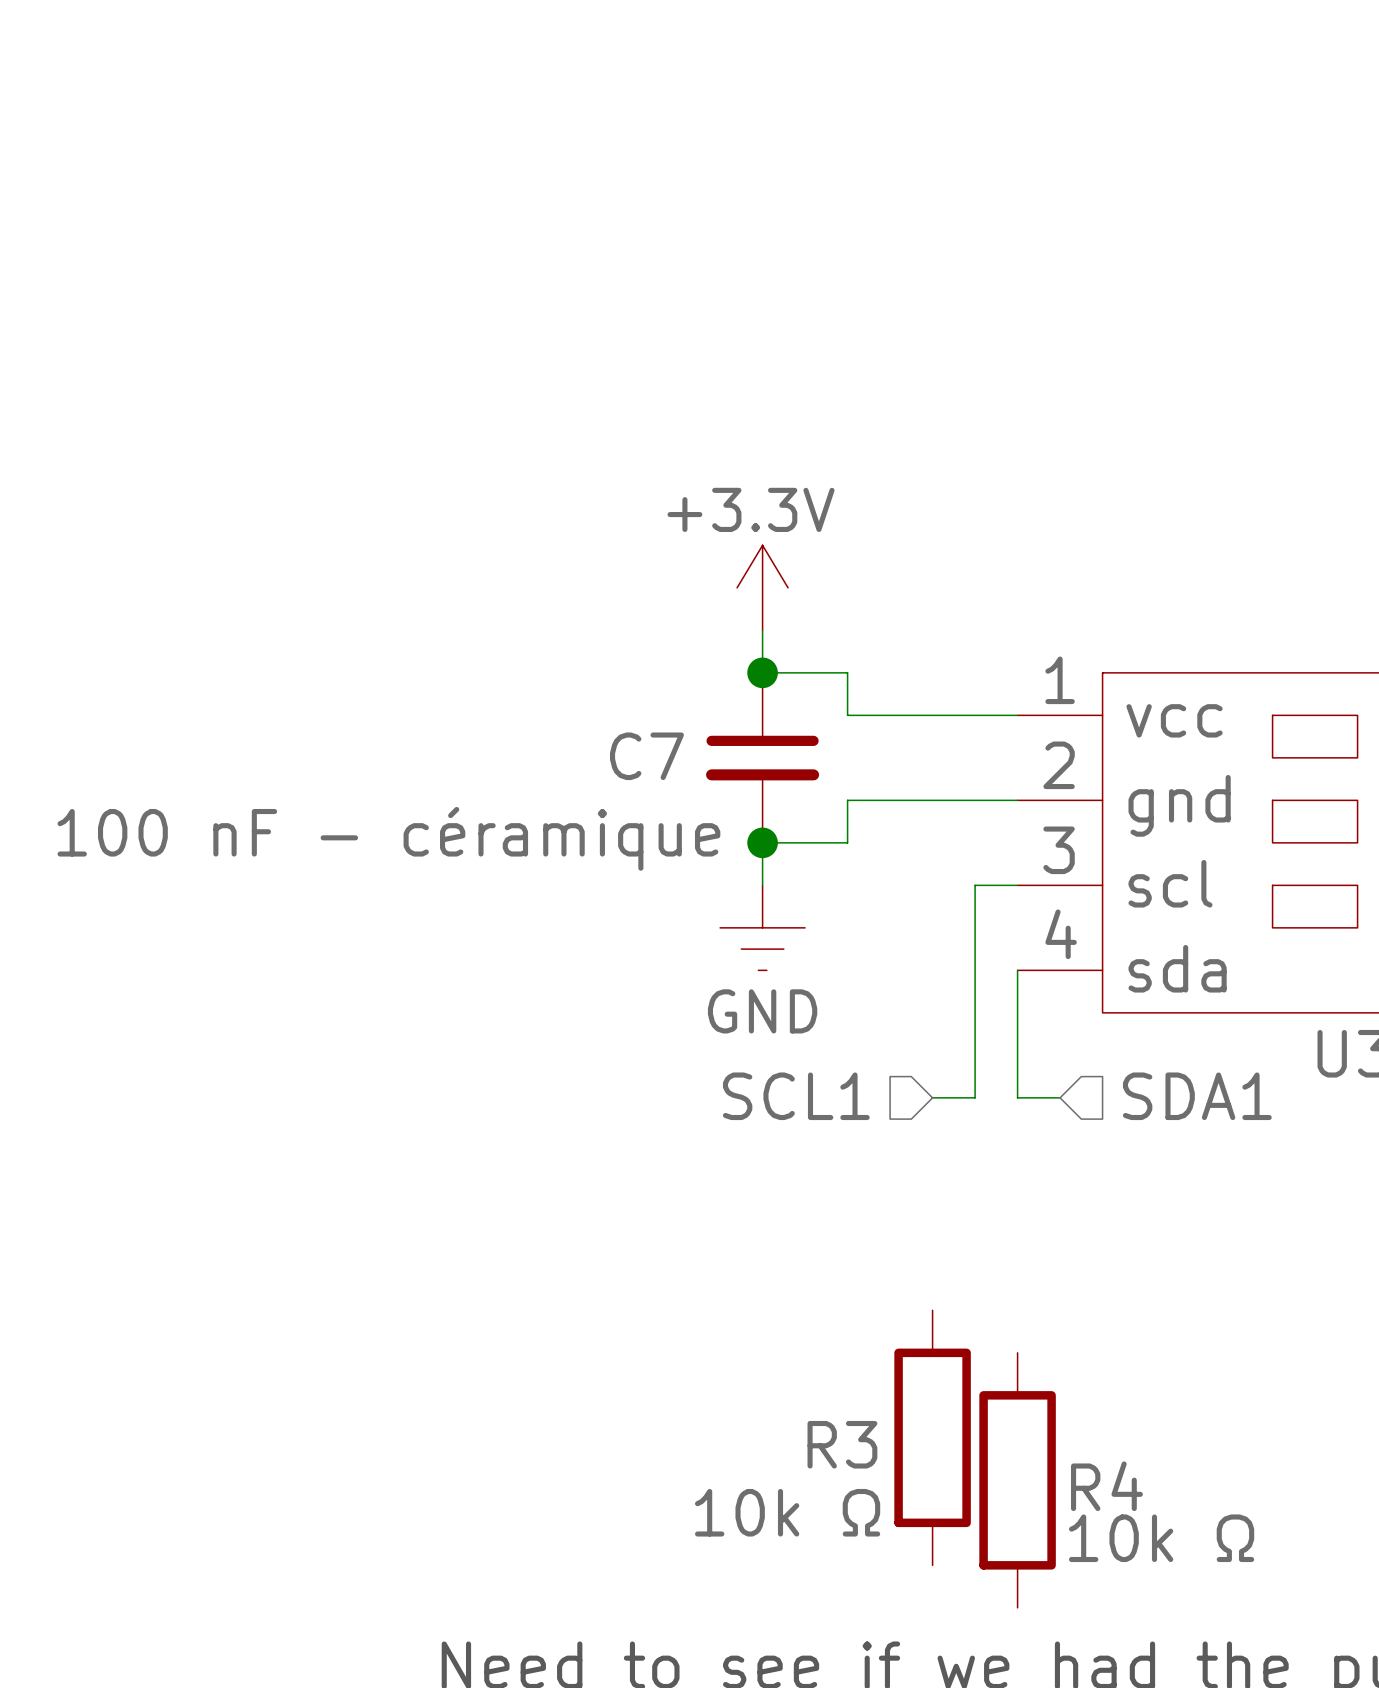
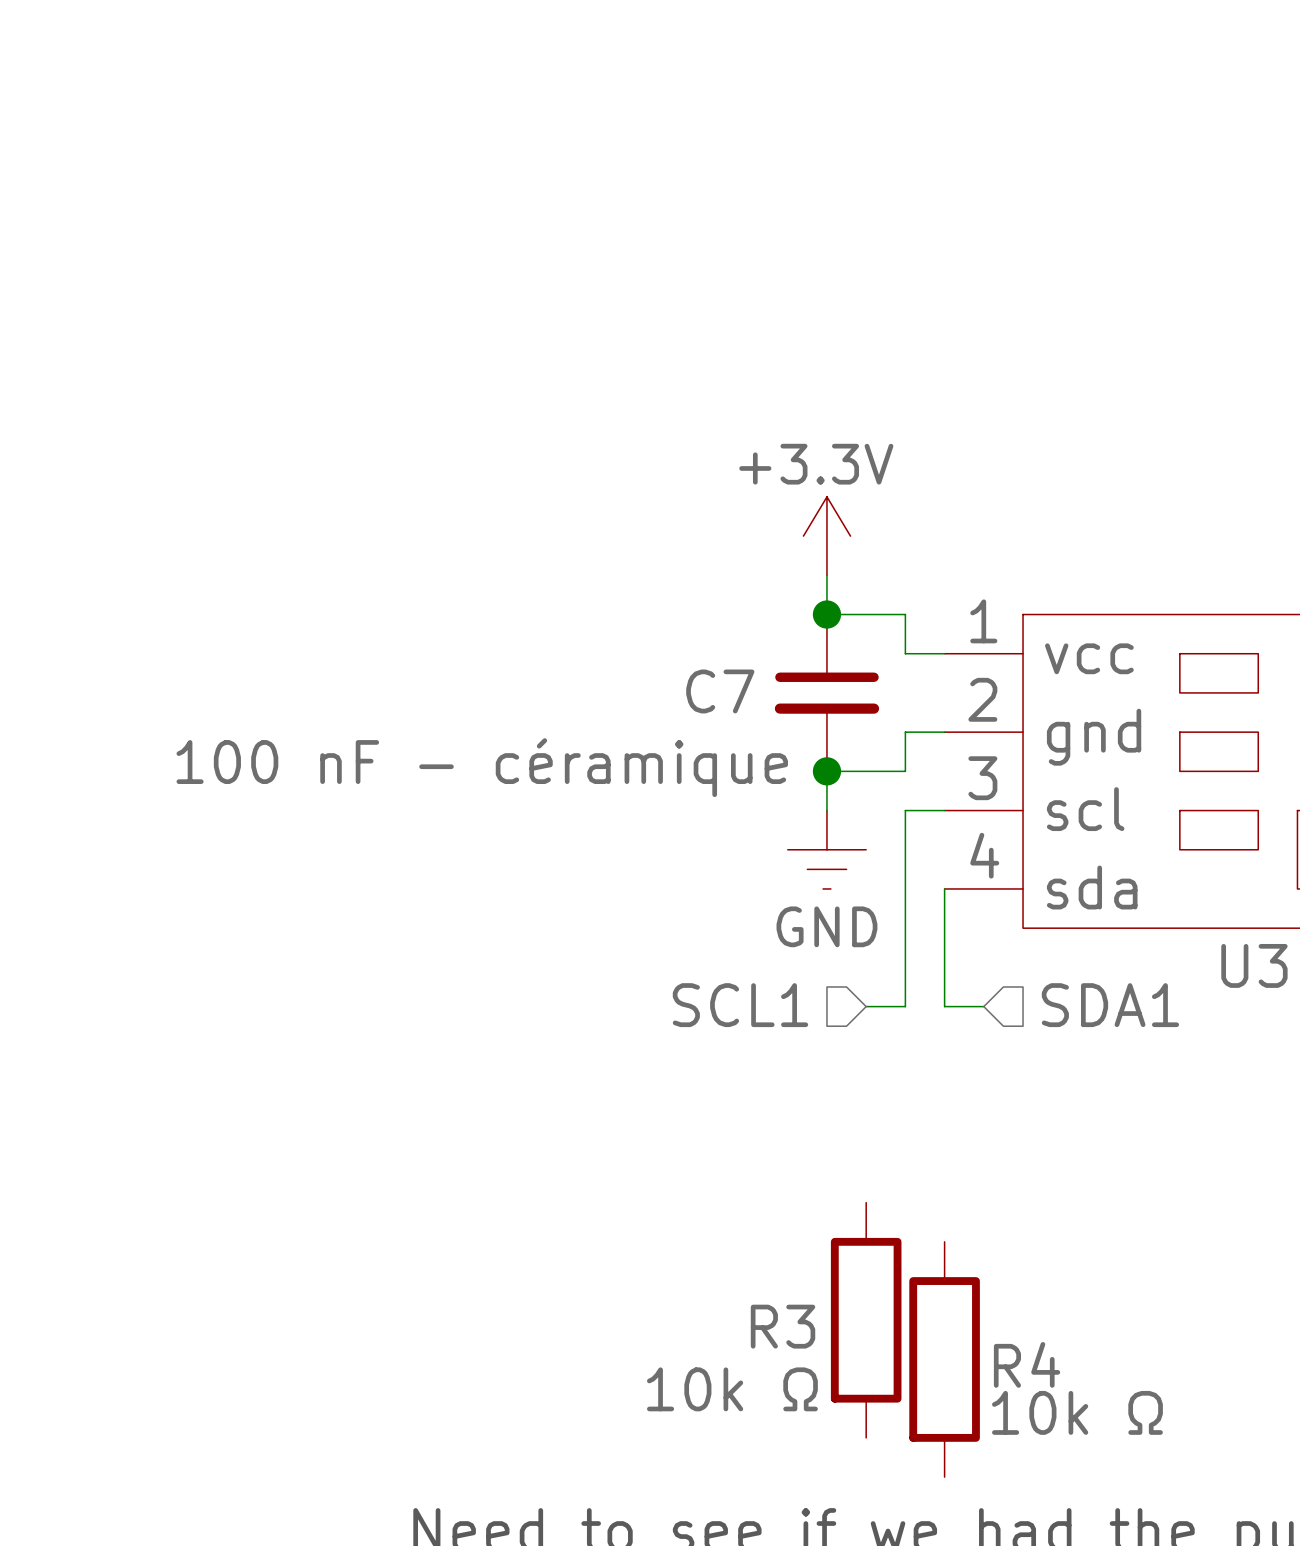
power symbol position: +3.3V (762, 587) -> +3.3V (826, 536)
wire: (762, 630) (762, 672) (847, 672) (847, 715) (975, 715) -> (826, 575) (826, 614) (905, 614) (905, 653)
junction: (762, 672) -> none
junction: none -> (826, 614)
C7 position: (762, 757) -> (826, 692)
wire: (975, 800) (847, 800) (847, 842) (762, 842) (762, 885) -> (905, 732) (905, 771) (826, 771) (826, 810)
junction: (762, 842) -> none
junction: none -> (826, 771)
power symbol position: GND (762, 927) -> GND (826, 849)

